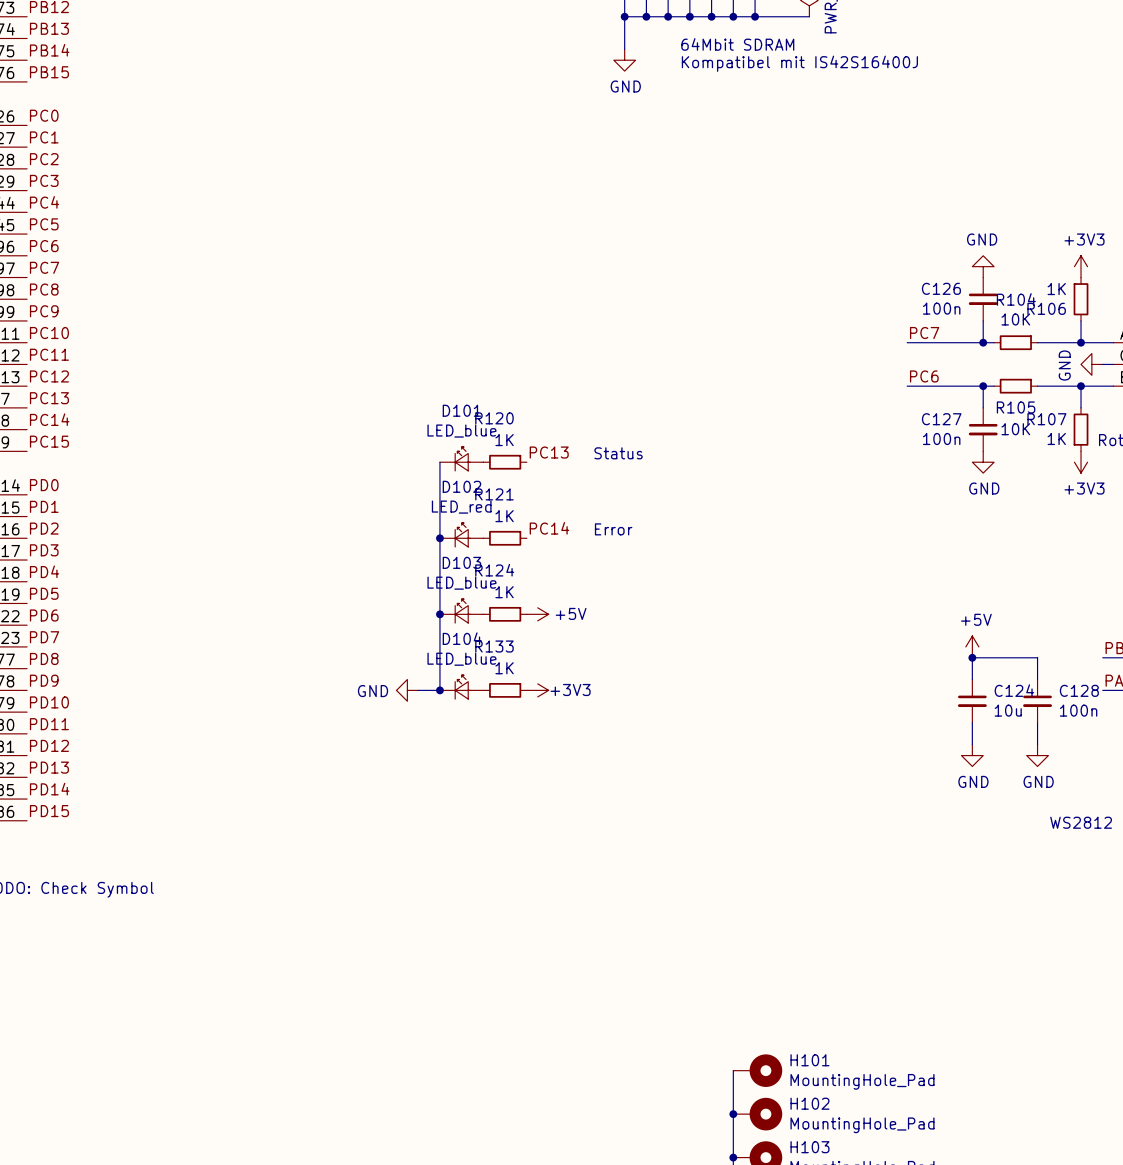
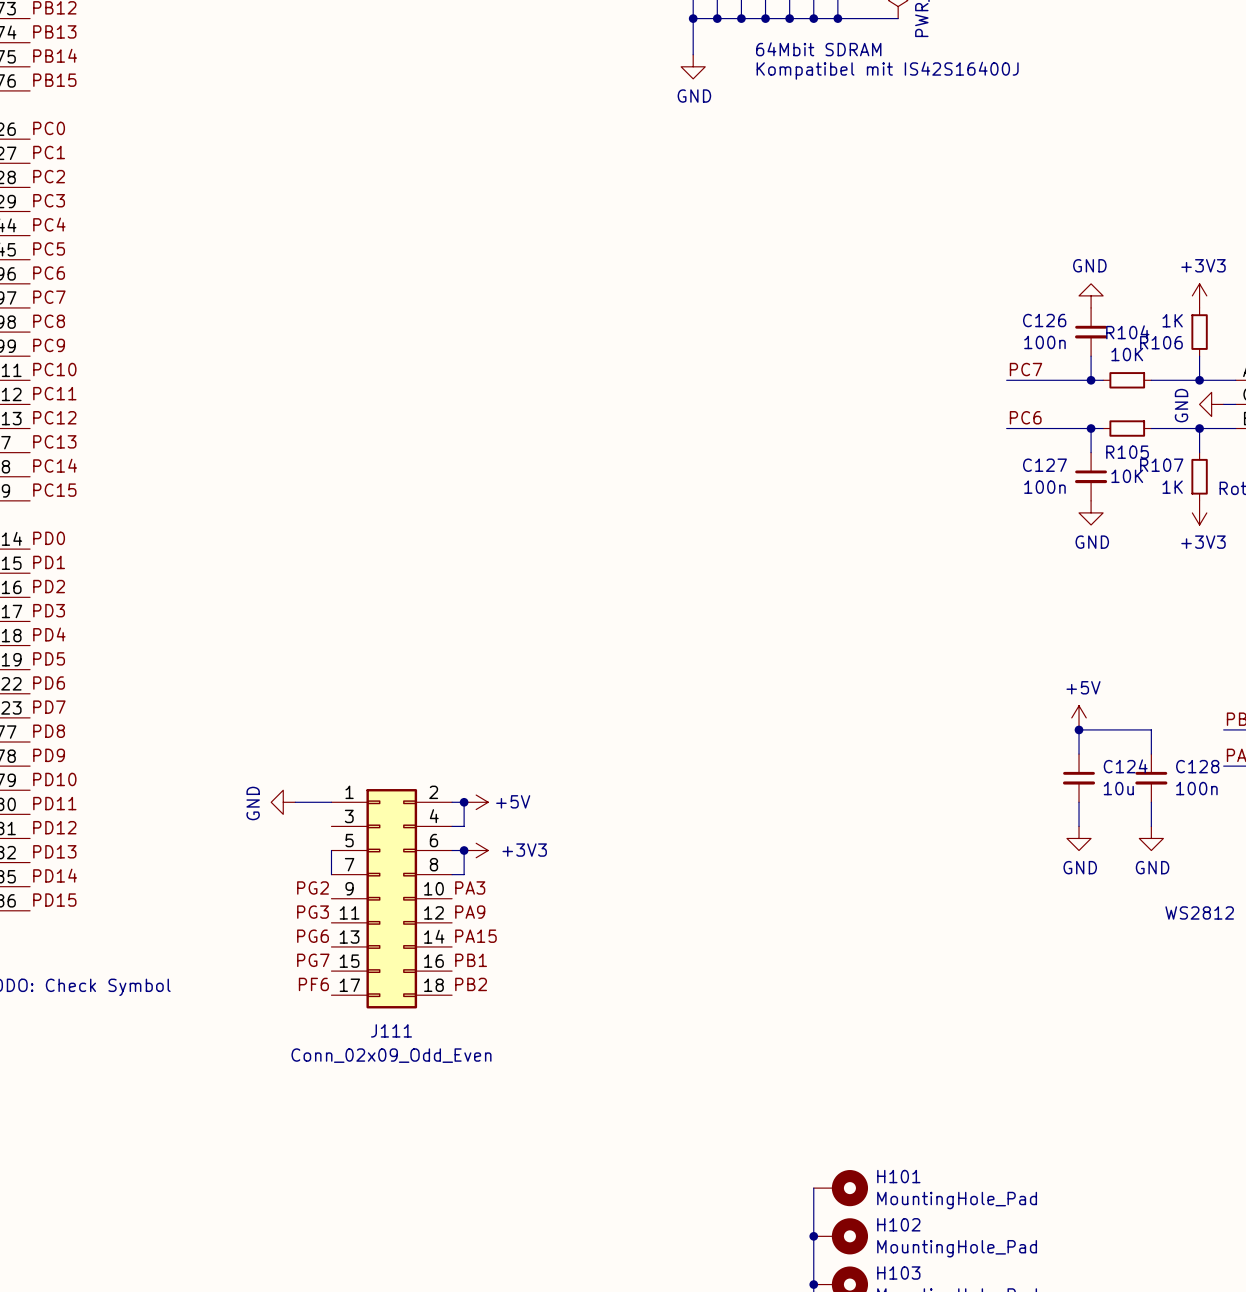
label: PC13 (549, 452) -> none
text: Status (618, 453) -> none
D101: LED_blue (461, 458) -> none
wire: (439, 462) (439, 690) (418, 690) -> none
R120: 1K (505, 462) -> none
label: PC14 (549, 528) -> none
text: Error (613, 529) -> none
D102: LED_red (461, 535) -> none
junction: (439, 538) -> none
R121: 1K (505, 538) -> none
D103: LED_blue (461, 611) -> none
junction: (439, 614) -> none
R124: 1K (505, 614) -> none
power symbol position: +5V (537, 614) -> +5V (476, 802)
D104: LED_blue (461, 687) -> none
power symbol text position: +3V3 (570, 689) -> +3V3 (524, 850)
power symbol position: GND (407, 690) -> GND (283, 802)
junction position: (439, 690) -> (464, 802)
R133: 1K (505, 690) -> none
power symbol position: +3V3 (537, 690) -> +3V3 (476, 850)
power symbol text rotation: 0° (373, 691) -> 90° counterclockwise (253, 803)
wire: none -> (295, 802) (331, 802)
wire: none -> (452, 802) (464, 802) (464, 826) (452, 826)
wire: none -> (331, 850) (331, 874)
wire: none -> (452, 850) (464, 850) (464, 874) (452, 874)
junction: none -> (464, 850)
label: none -> PG2 (313, 887)
label: none -> PA3 (470, 887)
J111: none -> Conn_02x09_Odd_Even (391, 898)
label: none -> PG3 (313, 912)
label: none -> PA9 (470, 912)
label: none -> PG6 (313, 936)
label: none -> PA15 (475, 936)
label: none -> PG7 (313, 960)
label: none -> PB1 (471, 960)
label: none -> PF6 (313, 984)
label: none -> PB2 (471, 984)

